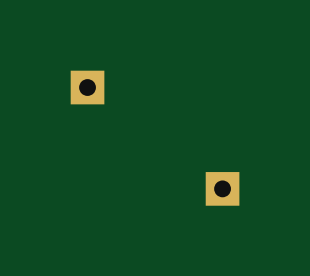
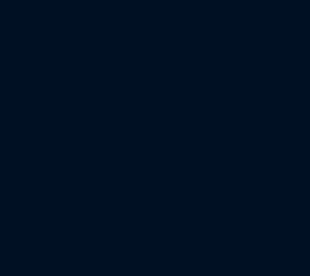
part: (87, 87) -> none
part: (222, 188) -> none

